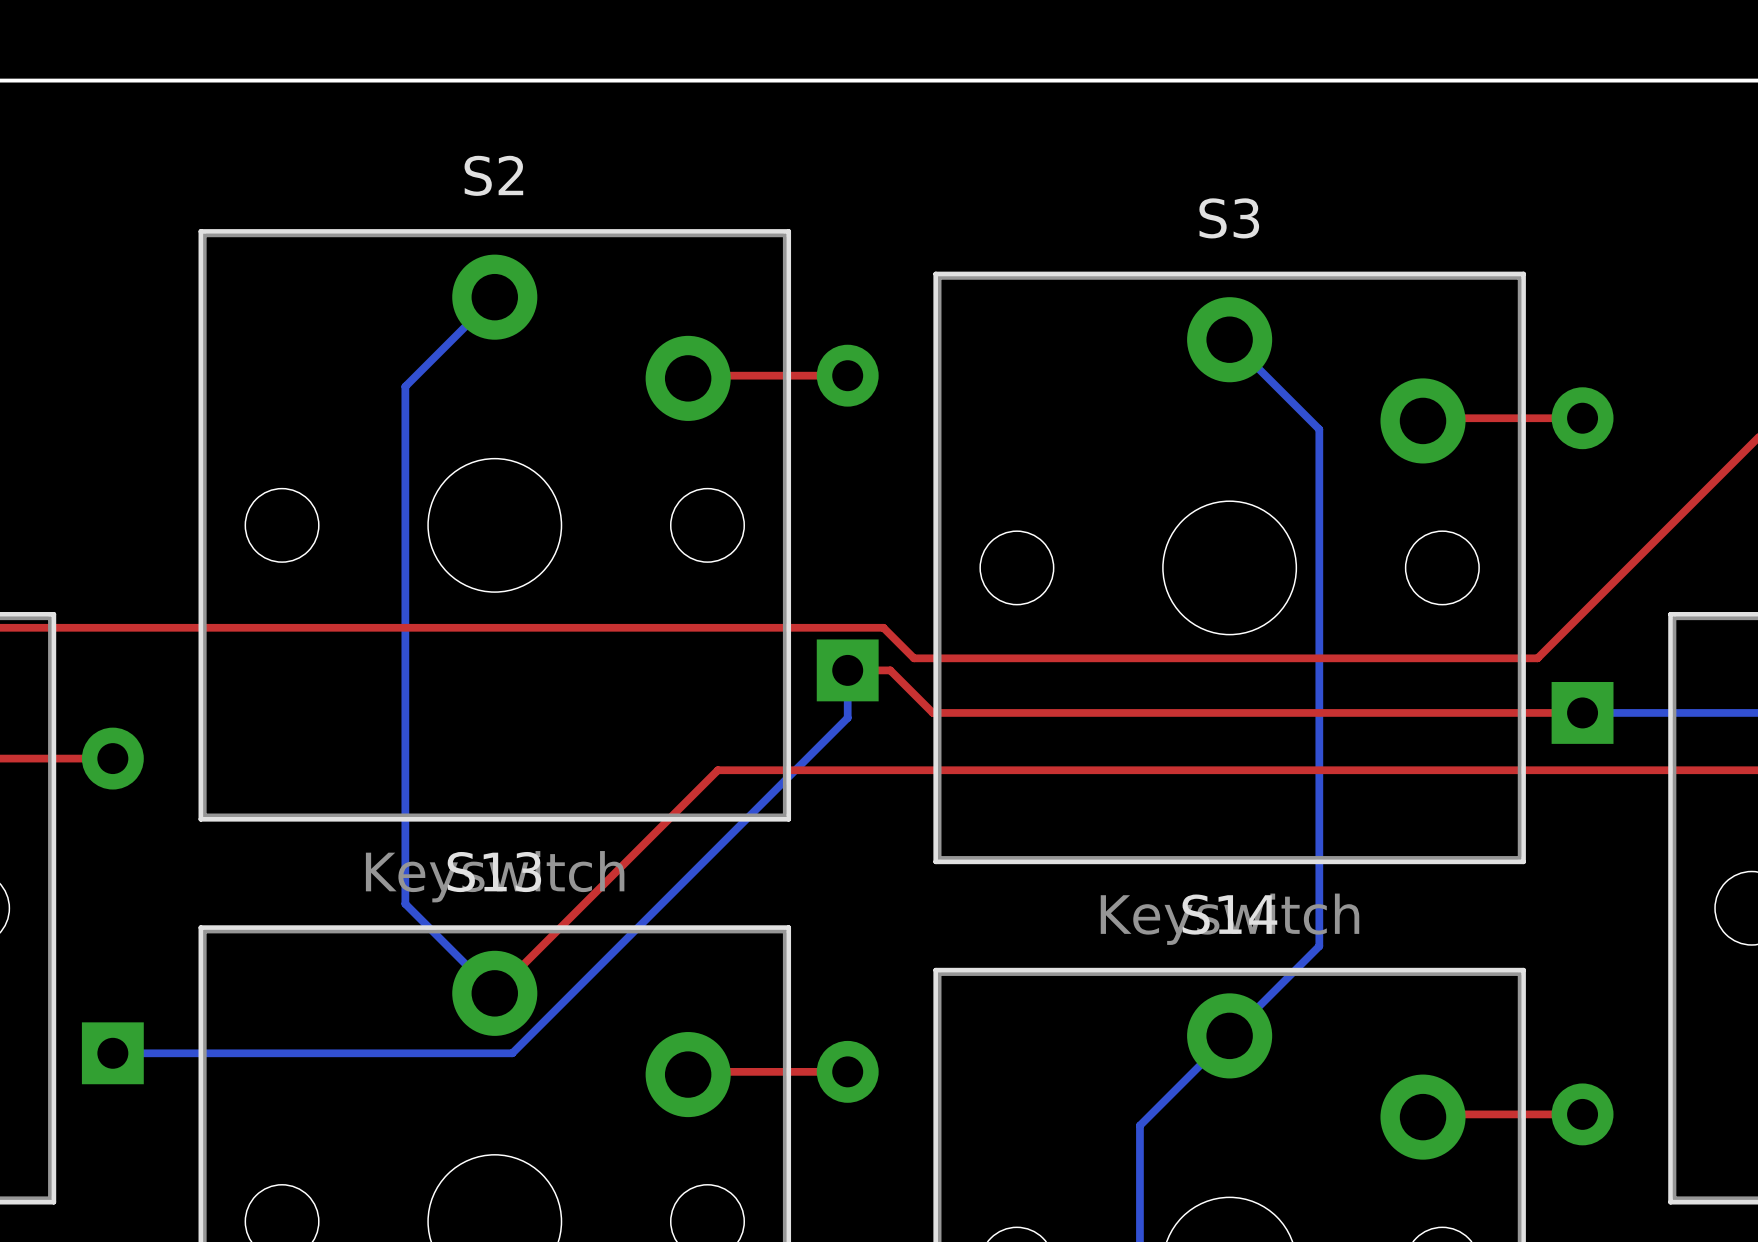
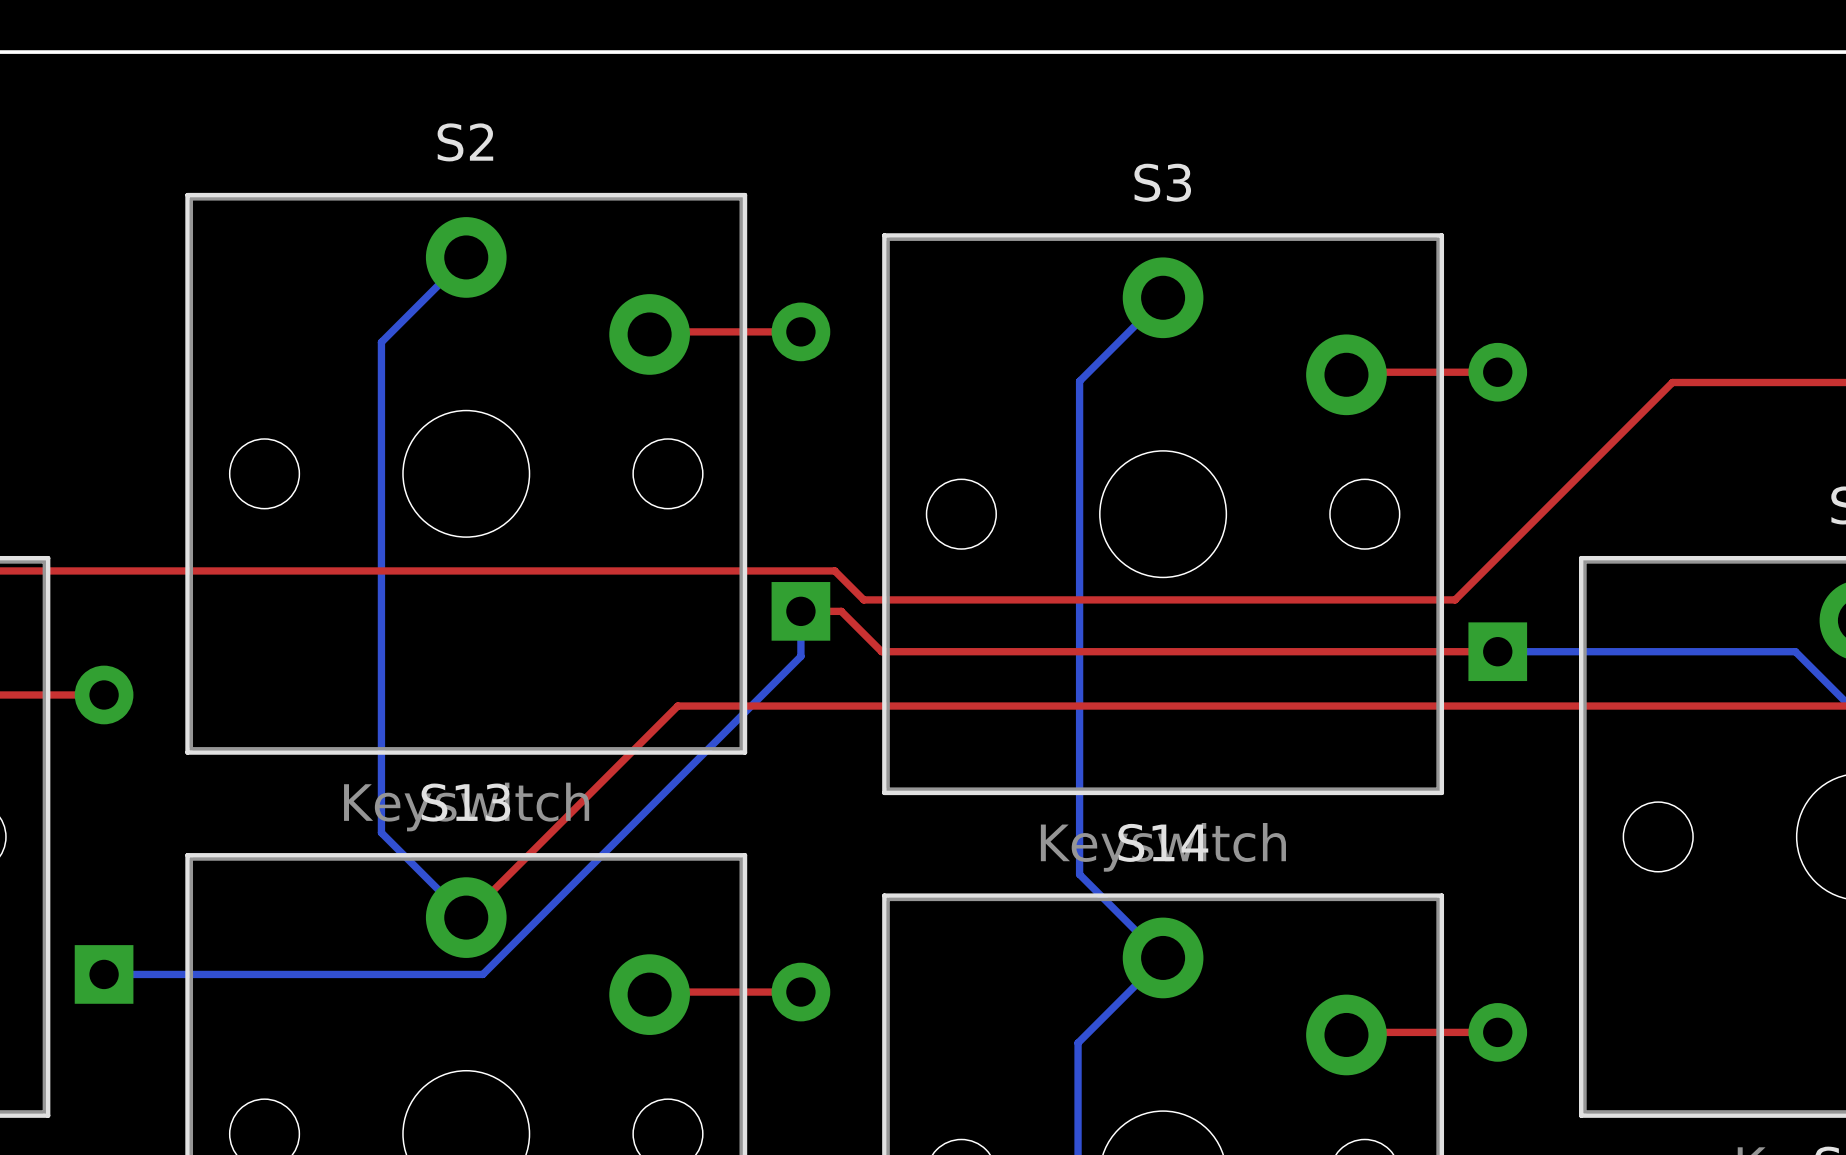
bottom track: (1229, 339) (1319, 429) (1319, 946) (1229, 1035) -> (1163, 297) (1079, 381) (1079, 874) (1163, 957)

